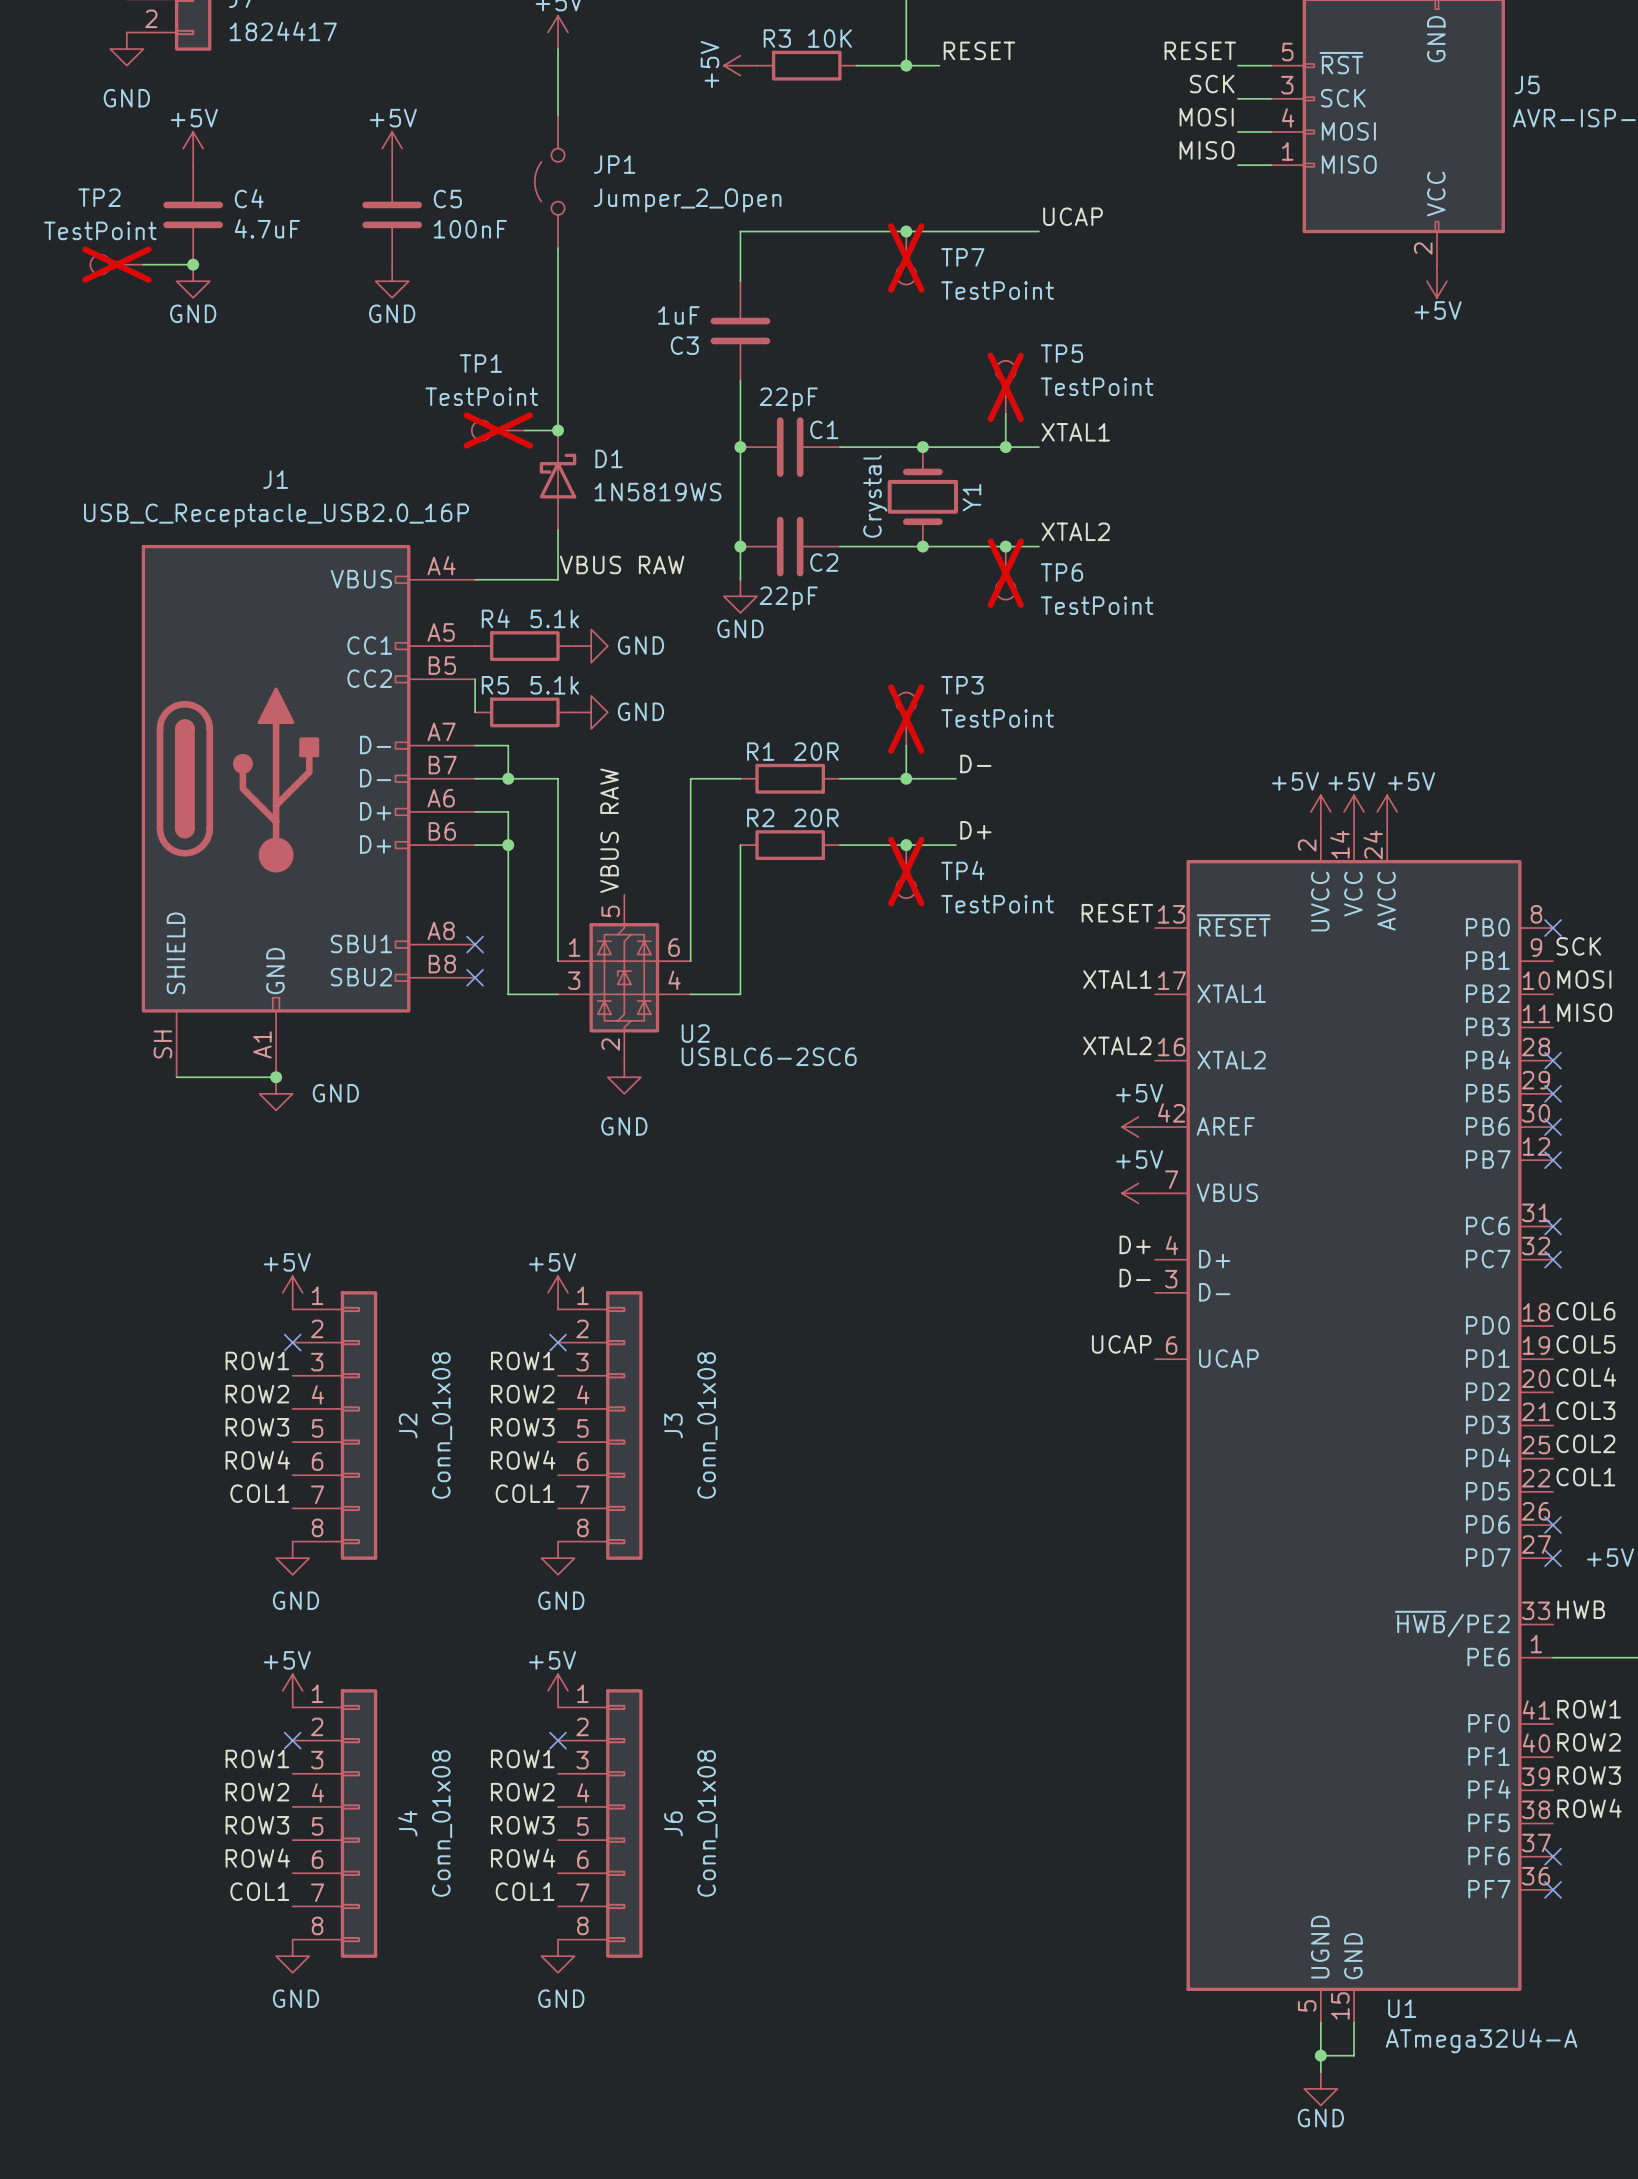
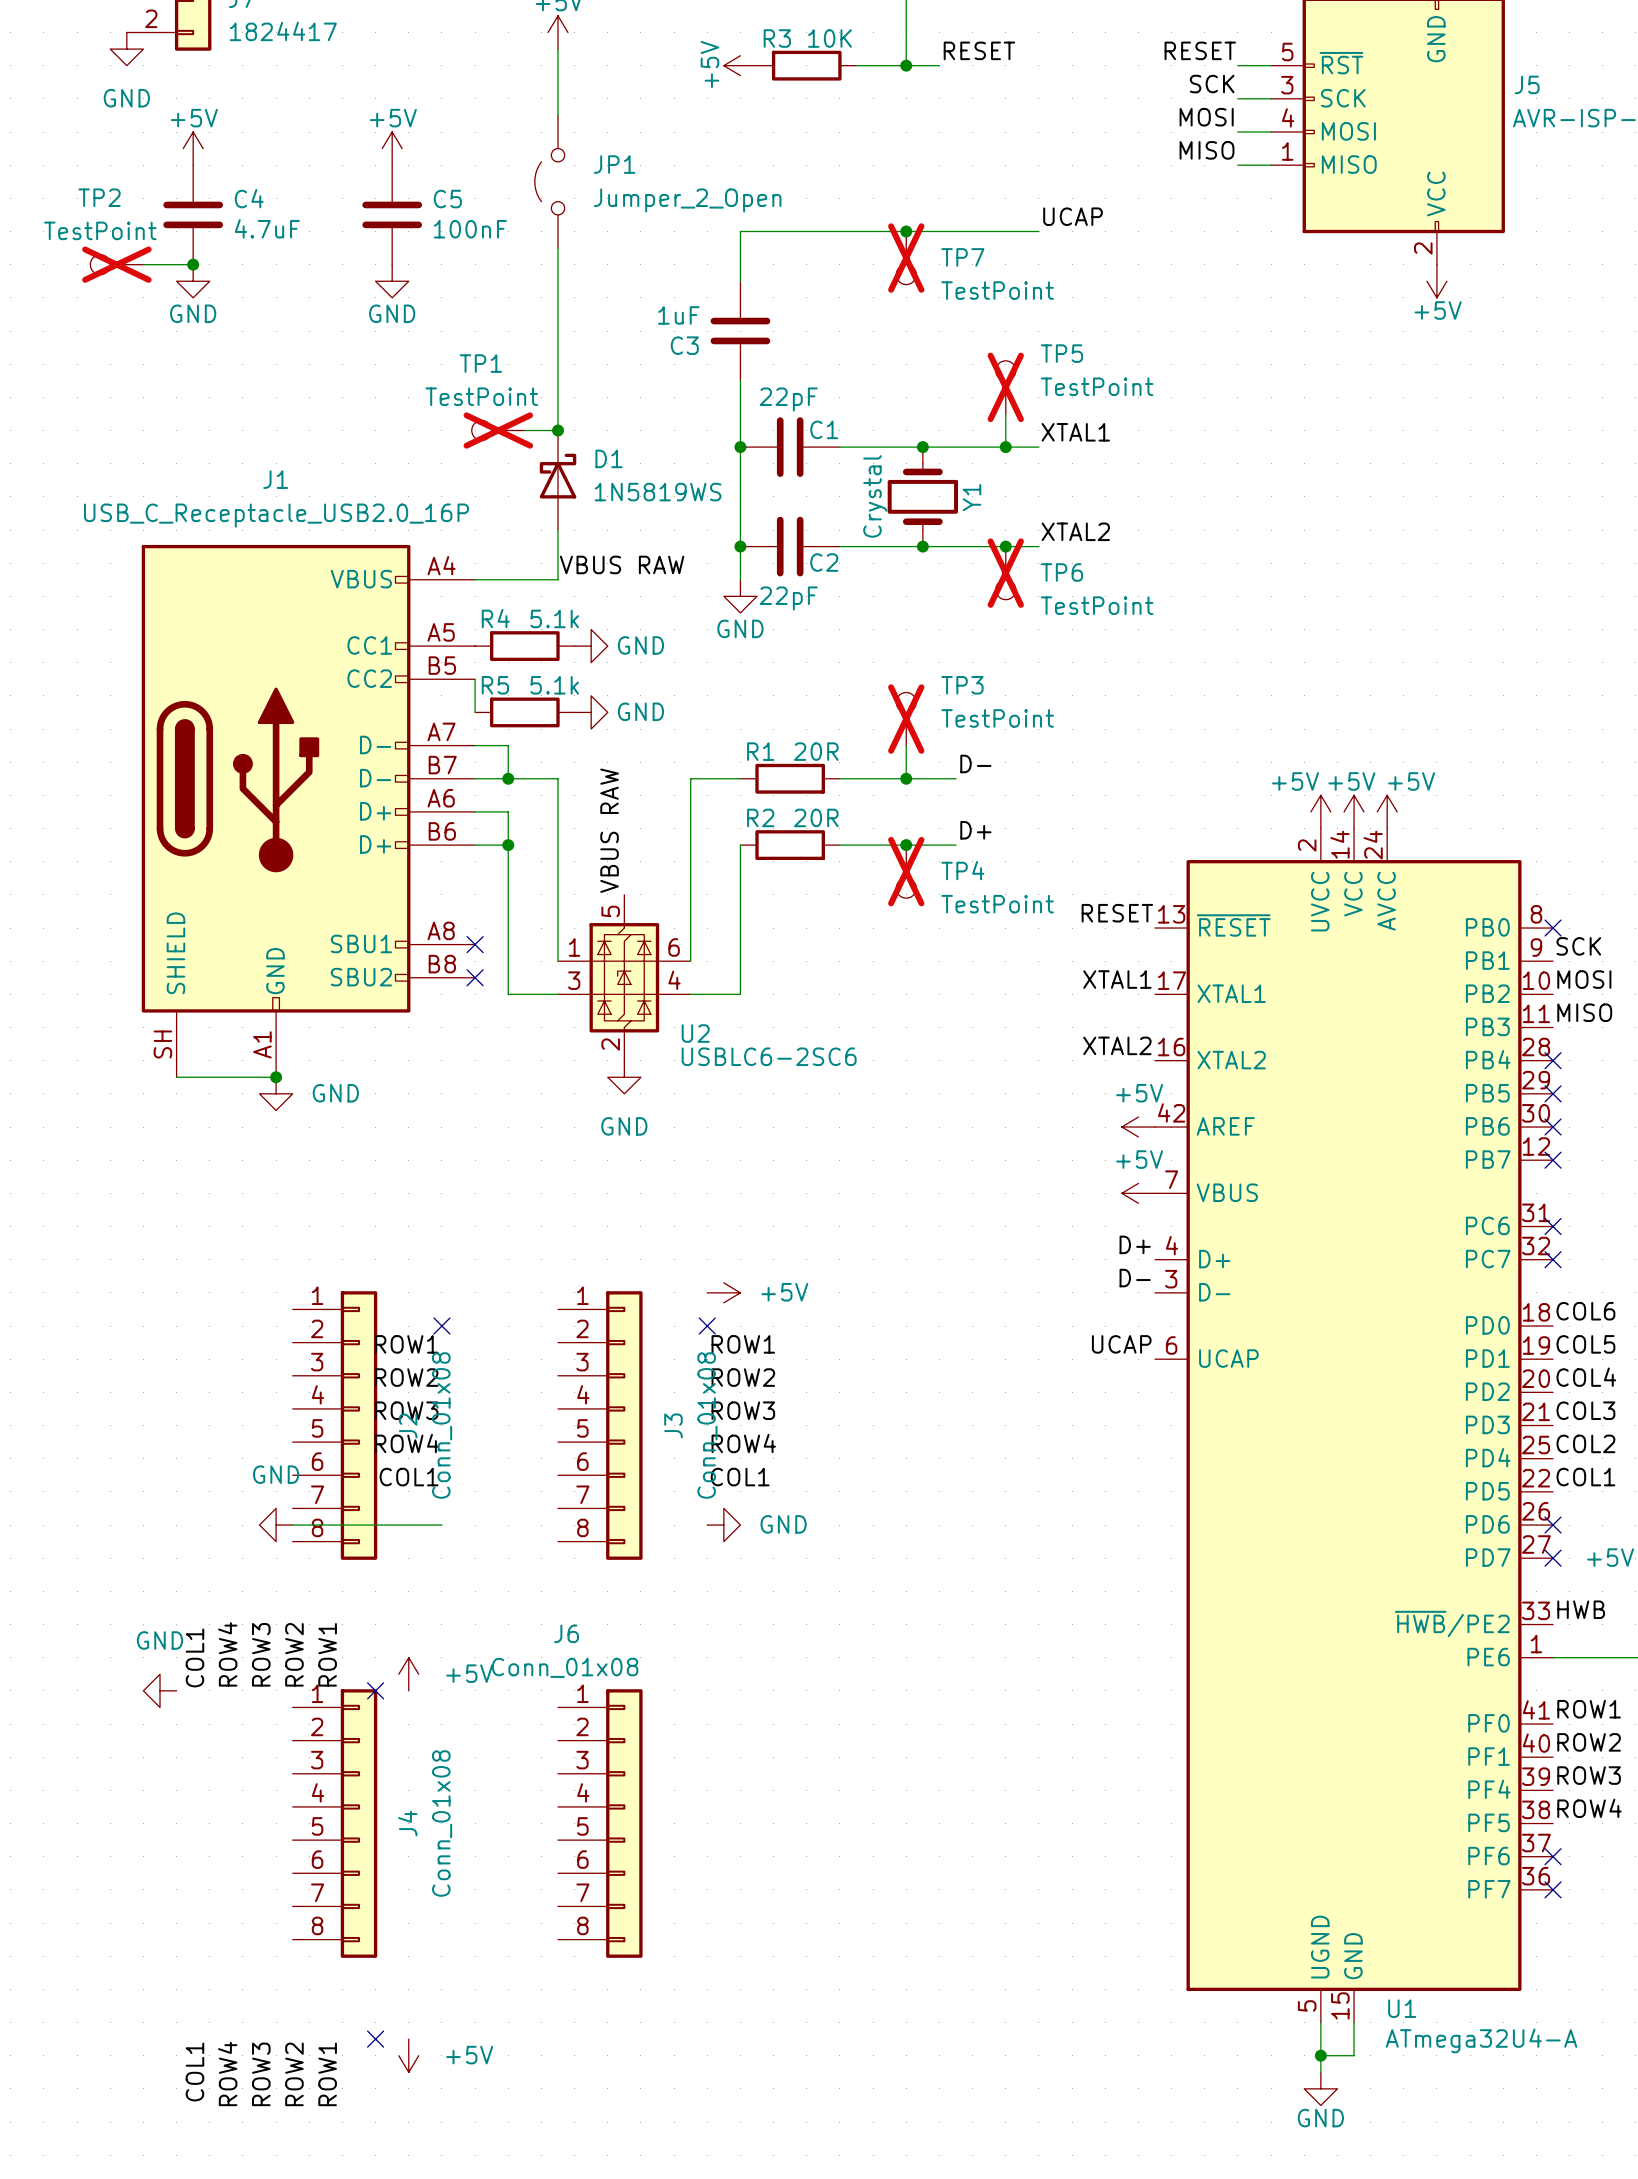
power symbol text position: +5V (552, 1262) -> +5V (784, 1292)
power symbol: +5V (292, 1292) -> none
power symbol rotation: 0° (558, 1292) -> 90° clockwise (723, 1292)
power symbol position: +5V (558, 1292) -> +5V (723, 1292)
no-connect mark: none -> (441, 1326)
no-connect mark: none -> (707, 1326)
no-connect mark: (292, 1342) -> none
no-connect mark: (558, 1342) -> none
label: none -> ROW1 (406, 1344)
label: none -> ROW1 (743, 1344)
label: ROW1 (257, 1360) -> none
label: ROW1 (522, 1360) -> none
label: none -> ROW2 (406, 1377)
label: none -> ROW2 (743, 1377)
label: ROW2 (257, 1394) -> none
label: ROW2 (522, 1394) -> none
label: none -> ROW3 (406, 1410)
label: none -> ROW3 (743, 1410)
label: ROW3 (257, 1427) -> none
label: ROW3 (522, 1427) -> none
label: none -> ROW4 (407, 1443)
label: none -> ROW4 (743, 1443)
label: ROW4 (257, 1460) -> none
label: ROW4 (523, 1460) -> none
label: none -> COL1 (409, 1477)
label: none -> COL1 (740, 1477)
label: COL1 (259, 1493) -> none
label: COL1 (525, 1493) -> none
wire: none -> (292, 1525) (441, 1525)
power symbol: none -> GND (723, 1525)
power symbol rotation: 0° (292, 1558) -> 90° clockwise (276, 1525)
power symbol position: GND (292, 1558) -> GND (276, 1525)
power symbol: GND (558, 1558) -> none
power symbol text position: GND (295, 1600) -> GND (276, 1474)
label: none -> ROW4 (227, 1654)
label: none -> ROW3 (261, 1654)
label: none -> COL1 (194, 1657)
power symbol: none -> +5V (408, 1674)
power symbol: none -> GND (160, 1690)
power symbol: +5V (292, 1690) -> none
no-connect mark: none -> (375, 1690)
power symbol: +5V (558, 1690) -> none
no-connect mark: (292, 1740) -> none
no-connect mark: (558, 1740) -> none
label rotation: 0° (257, 1758) -> 90° counterclockwise (327, 1654)
label position: ROW1 (257, 1758) -> ROW1 (327, 1654)
label: ROW1 (522, 1758) -> none
label rotation: 0° (257, 1792) -> 90° counterclockwise (294, 1654)
label position: ROW2 (257, 1792) -> ROW2 (294, 1654)
label: ROW2 (522, 1792) -> none
J6 name rotation: 0° (673, 1823) -> 90° clockwise (566, 1633)
J6 name position: J6 (673, 1823) -> J6 (566, 1633)
J6 value rotation: 0° (707, 1823) -> 90° clockwise (565, 1667)
J6 value position: Conn_01x08 (707, 1823) -> Conn_01x08 (565, 1667)
label: ROW3 (257, 1825) -> none
label: ROW3 (522, 1825) -> none
label: ROW4 (257, 1858) -> none
label: ROW4 (523, 1858) -> none
label: COL1 (259, 1891) -> none
label: COL1 (525, 1891) -> none
power symbol: GND (292, 1956) -> none
power symbol: GND (558, 1956) -> none
no-connect mark: none -> (375, 2039)
power symbol: none -> +5V (408, 2055)
label: none -> COL1 (194, 2072)
label: none -> ROW4 (227, 2073)
label: none -> ROW3 (261, 2074)
label: none -> ROW2 (294, 2074)
label: none -> ROW1 (327, 2074)

